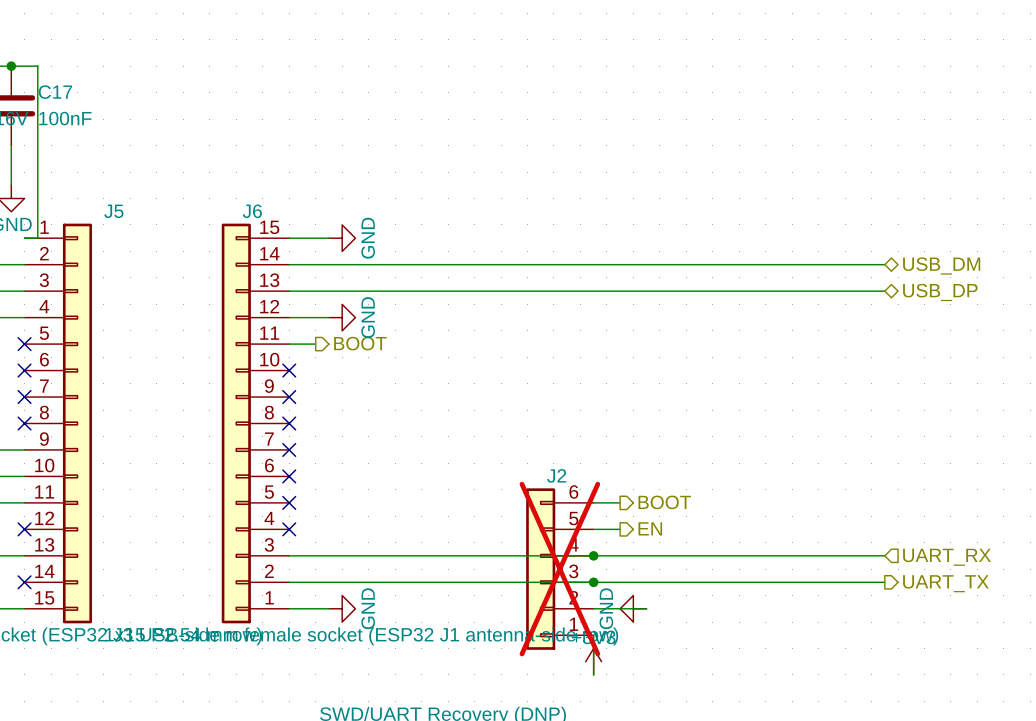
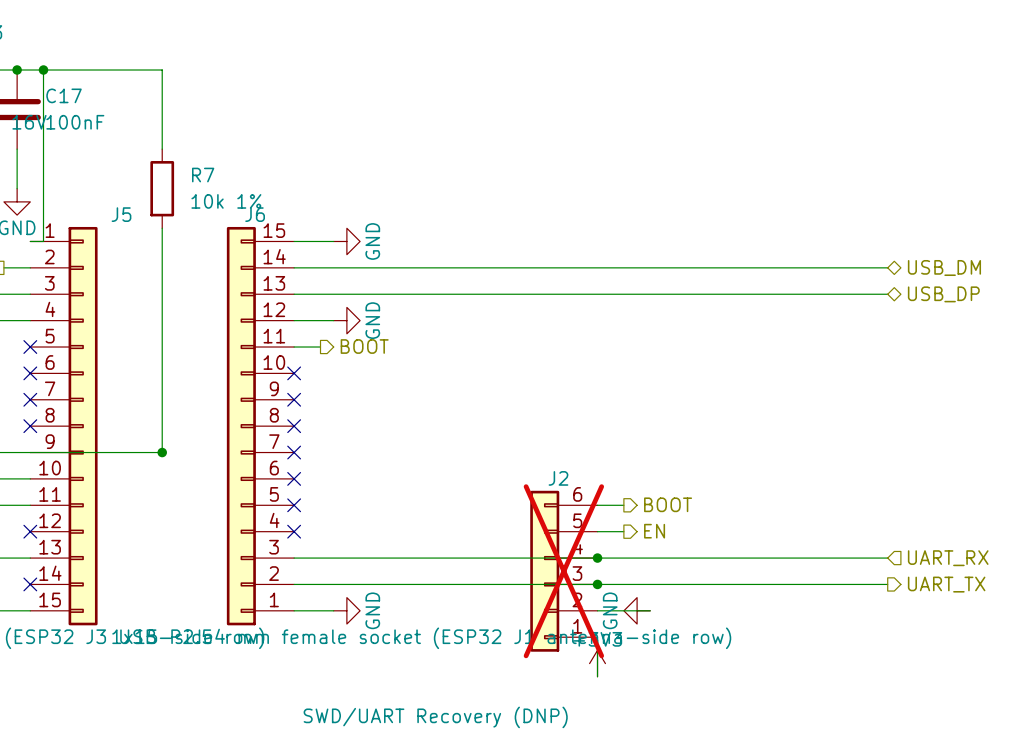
wire: none -> (43, 70) (162, 70) (162, 149)
junction: none -> (43, 70)
R7: none -> 10k 1% (162, 188)
wire: none -> (162, 228) (162, 452) (30, 452)
junction: none -> (162, 452)

